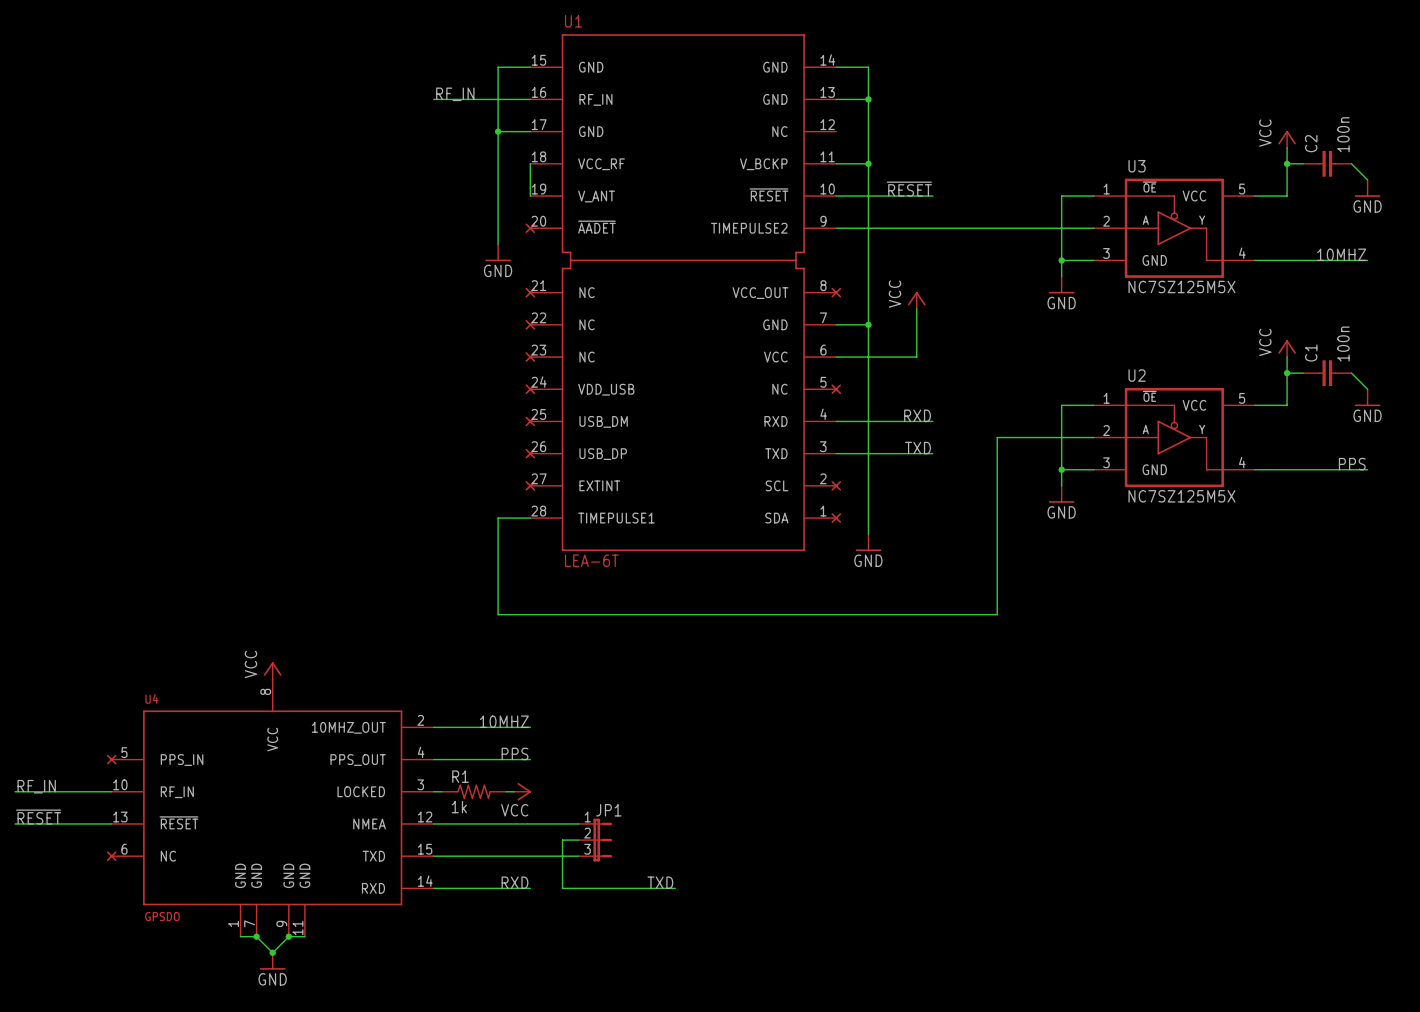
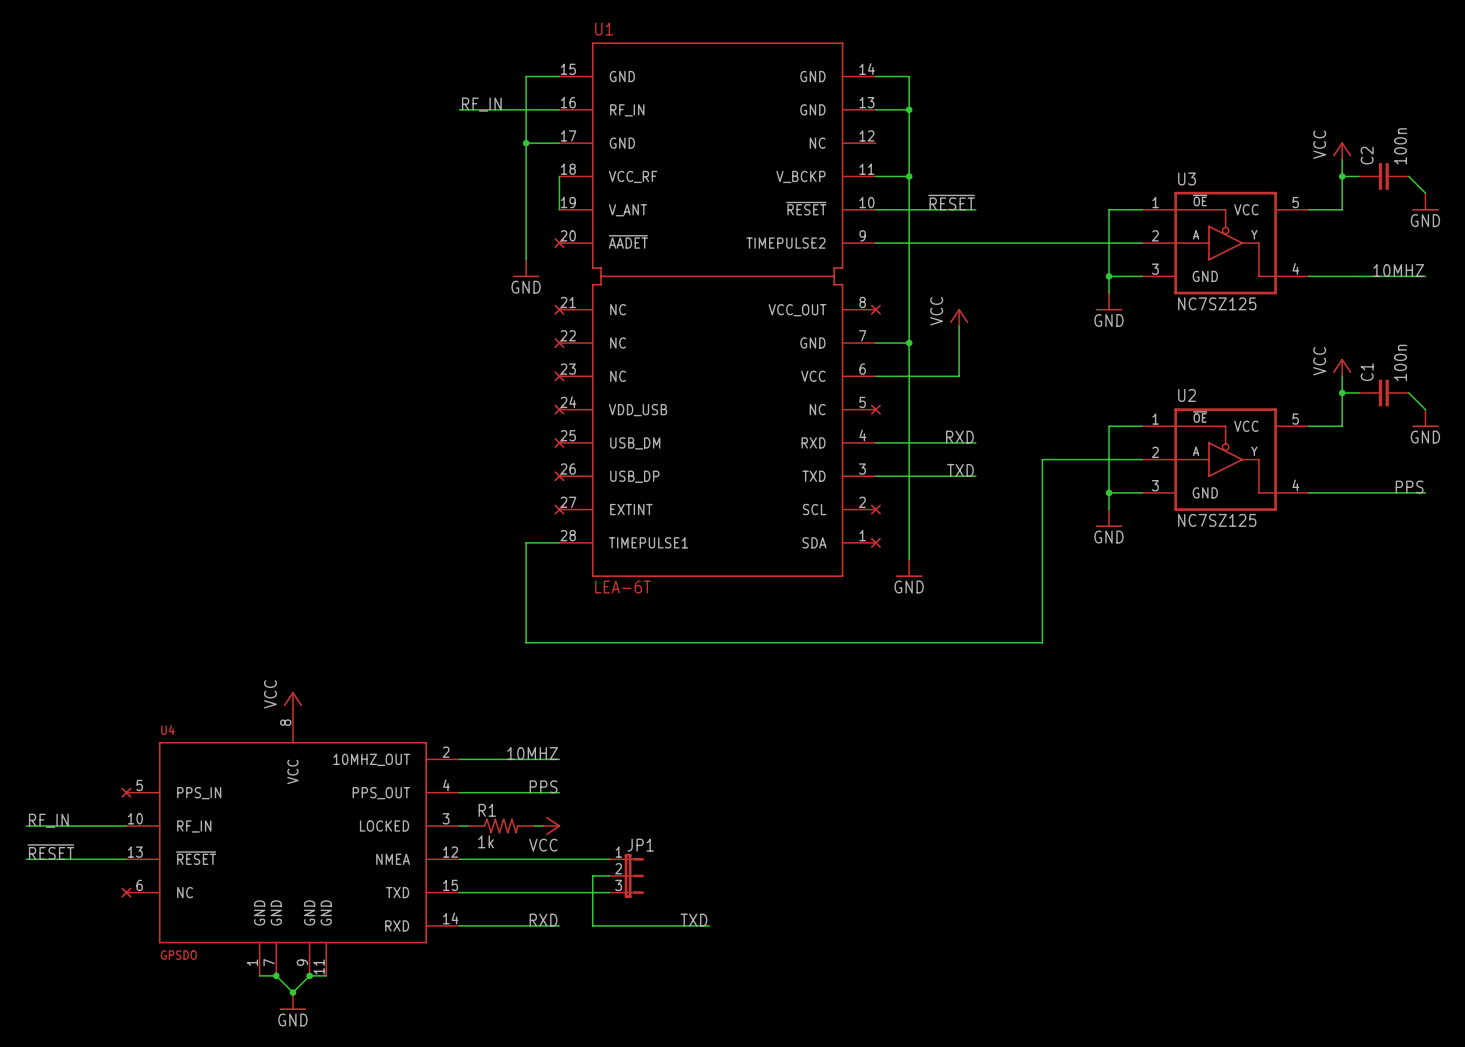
U3 value: NC7SZ125M5X (1181, 287) -> NC7SZ125 (1217, 303)
U2 value: NC7SZ125M5X (1181, 496) -> NC7SZ125 (1217, 520)

